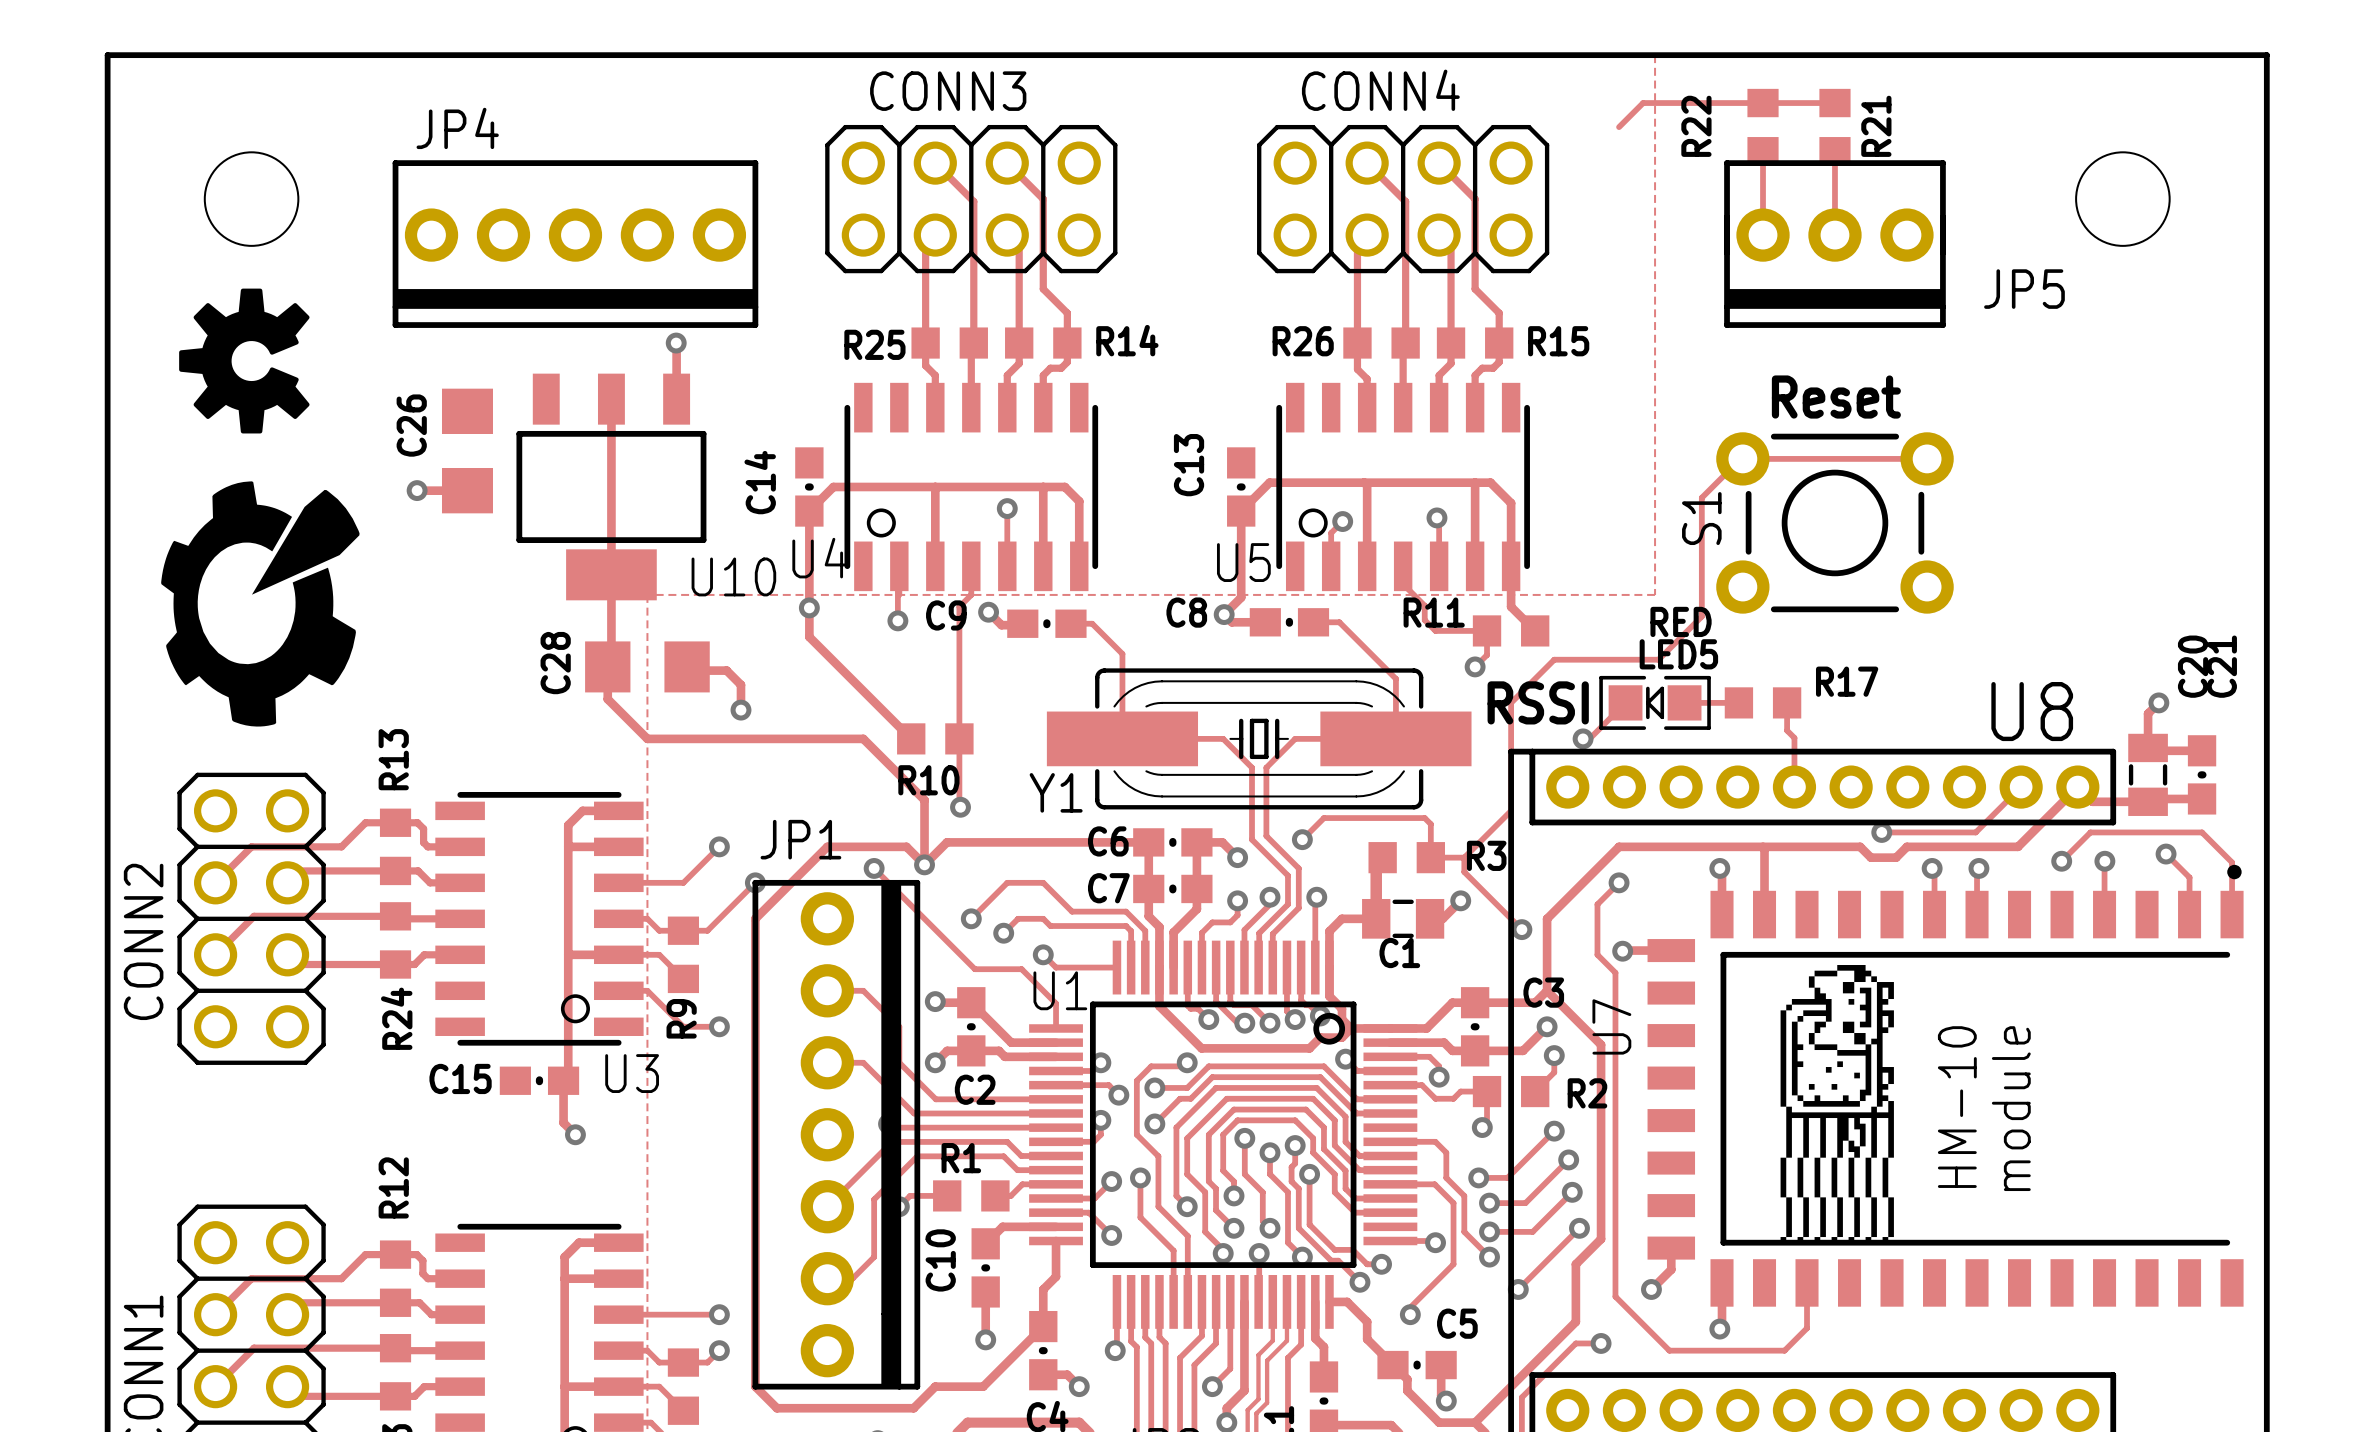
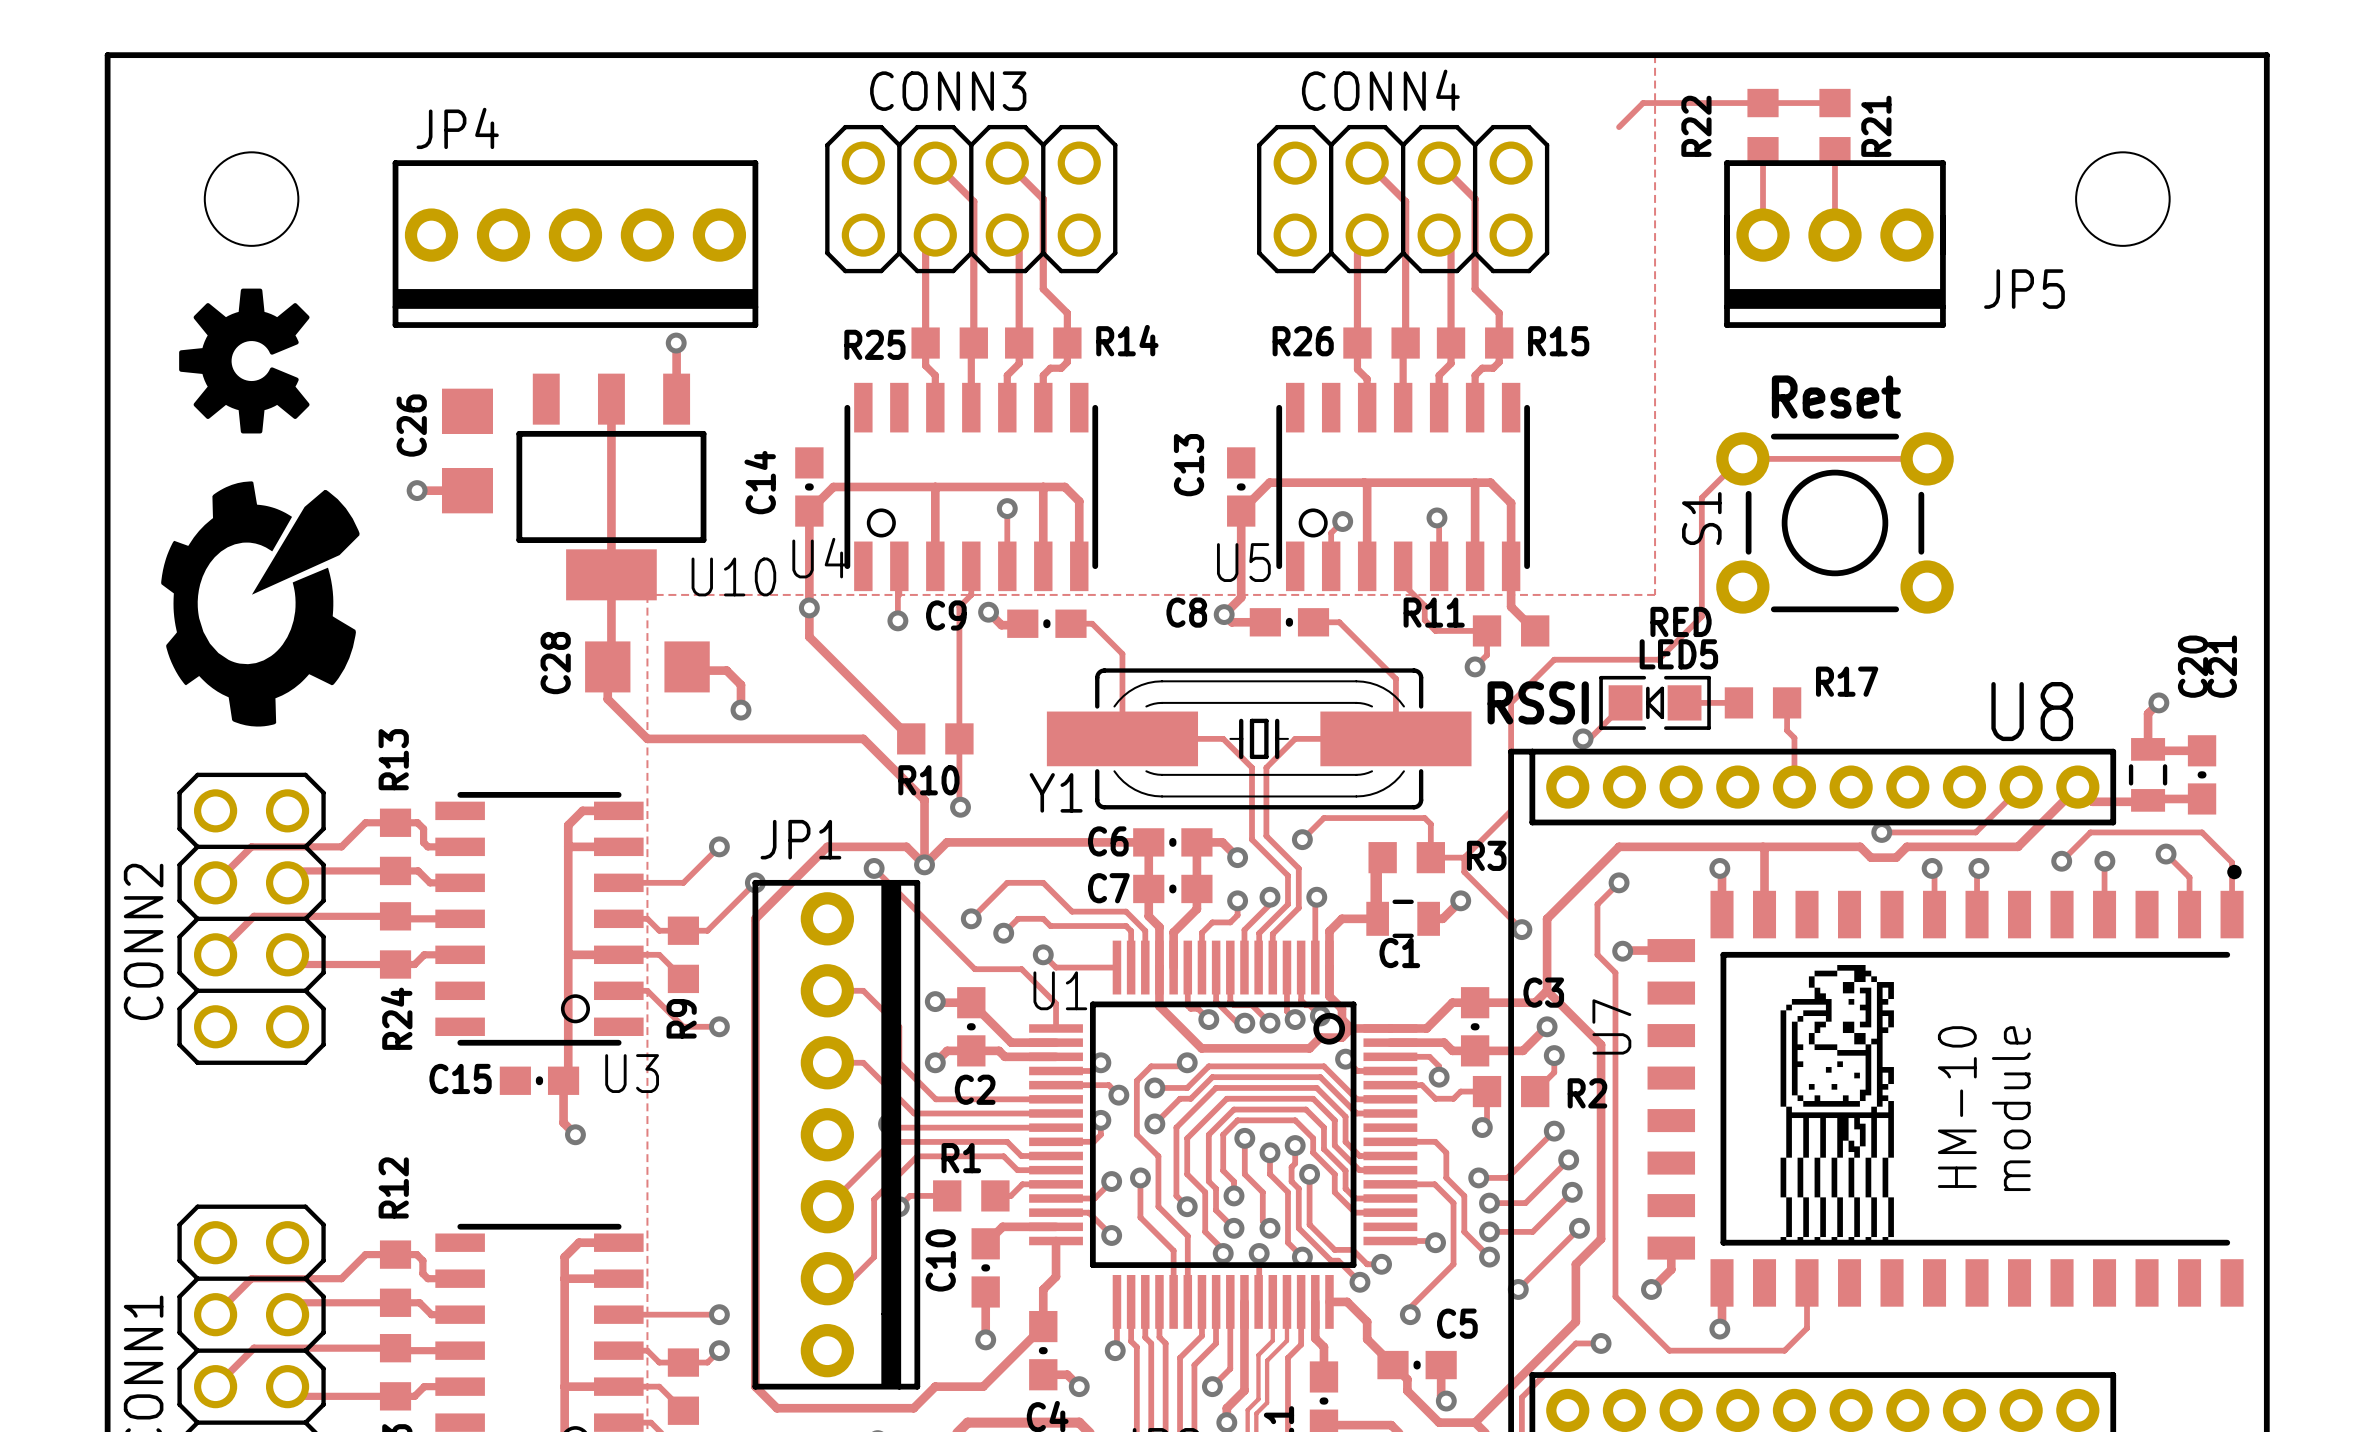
C20 footprint: [2128, 733, 2168, 816] -> [2128, 738, 2168, 812]
C1 footprint: [1362, 898, 1445, 939] -> [1366, 899, 1440, 938]

